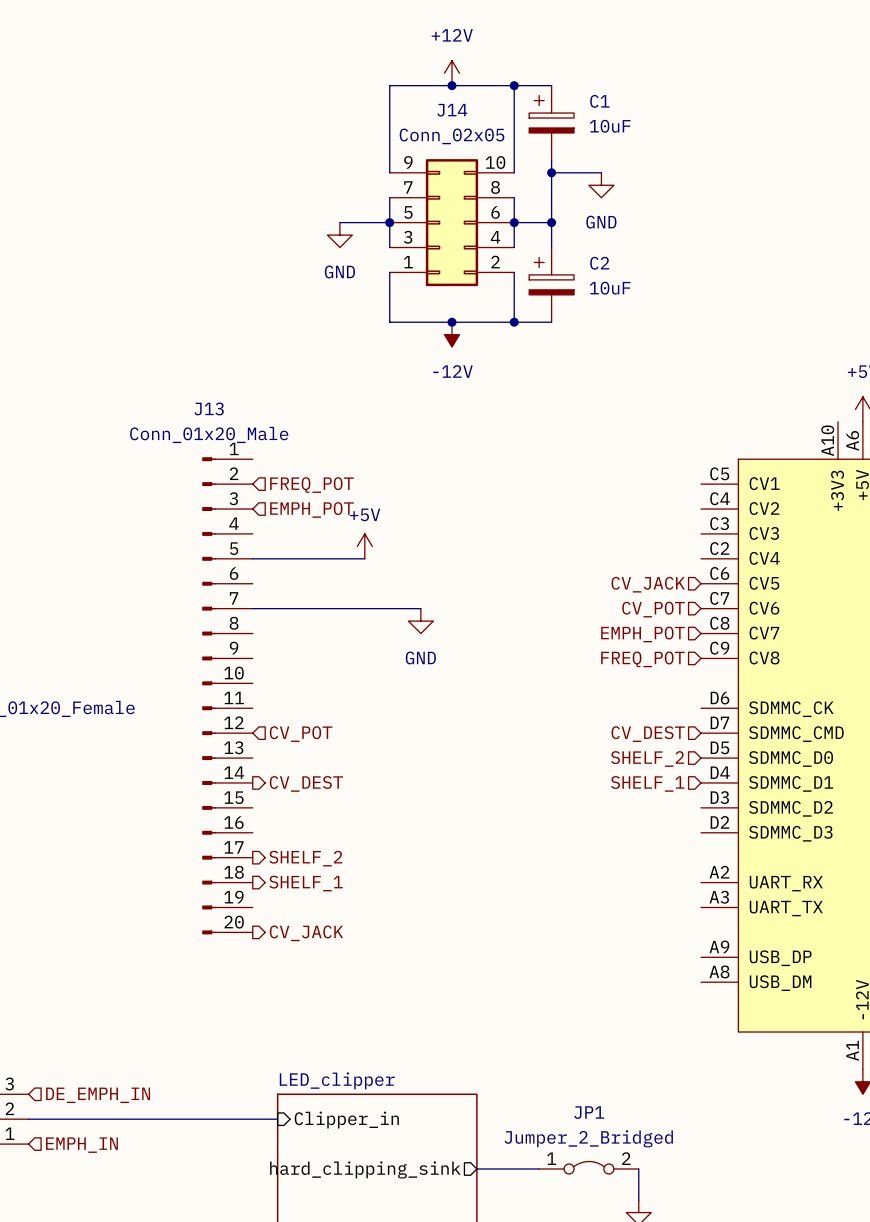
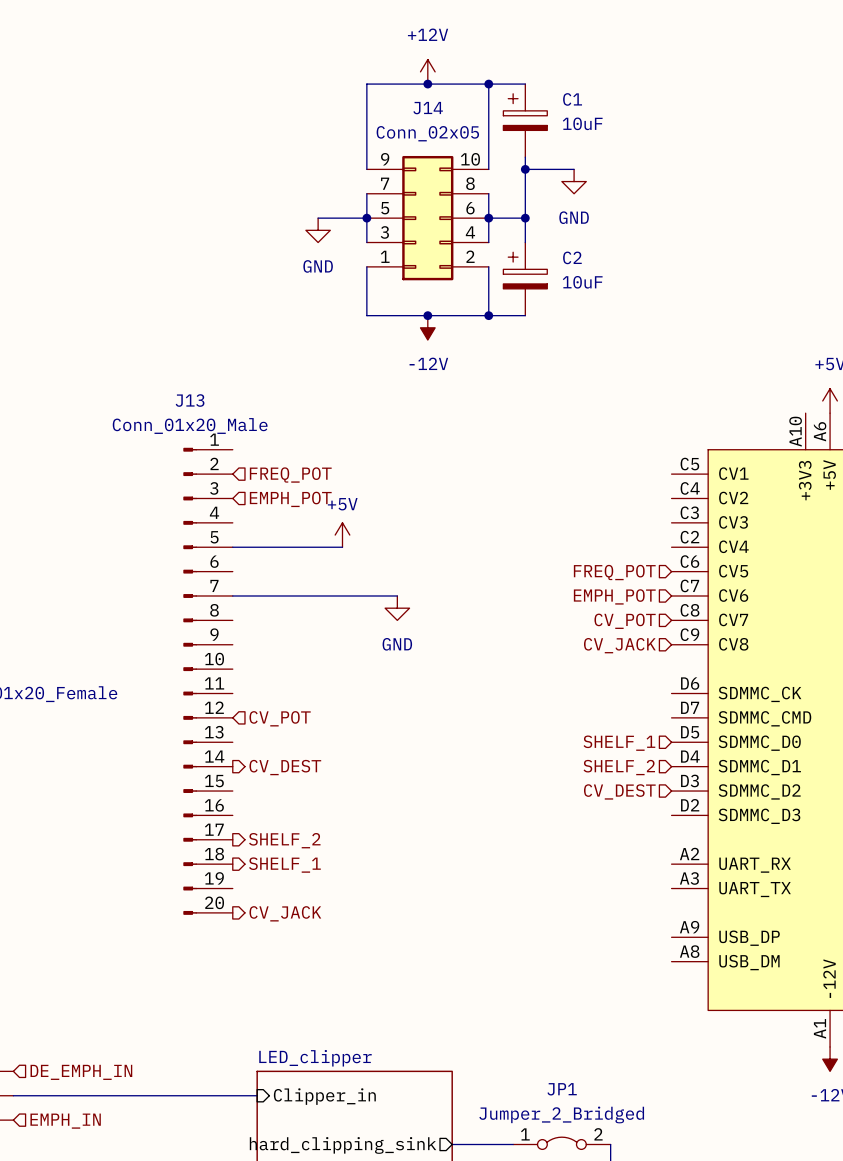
hierarchical label: CV_JACK (648, 584) -> FREQ_POT (614, 572)
hierarchical label: CV_POT (653, 609) -> EMPH_POT (614, 596)
hierarchical label: EMPH_POT (642, 634) -> CV_POT (625, 621)
hierarchical label: FREQ_POT (642, 659) -> CV_JACK (619, 645)
hierarchical label position: CV_DEST (648, 734) -> CV_DEST (619, 791)
hierarchical label: SHELF_2 (647, 759) -> SHELF_1 (619, 743)
hierarchical label: SHELF_1 (647, 783) -> SHELF_2 (619, 767)

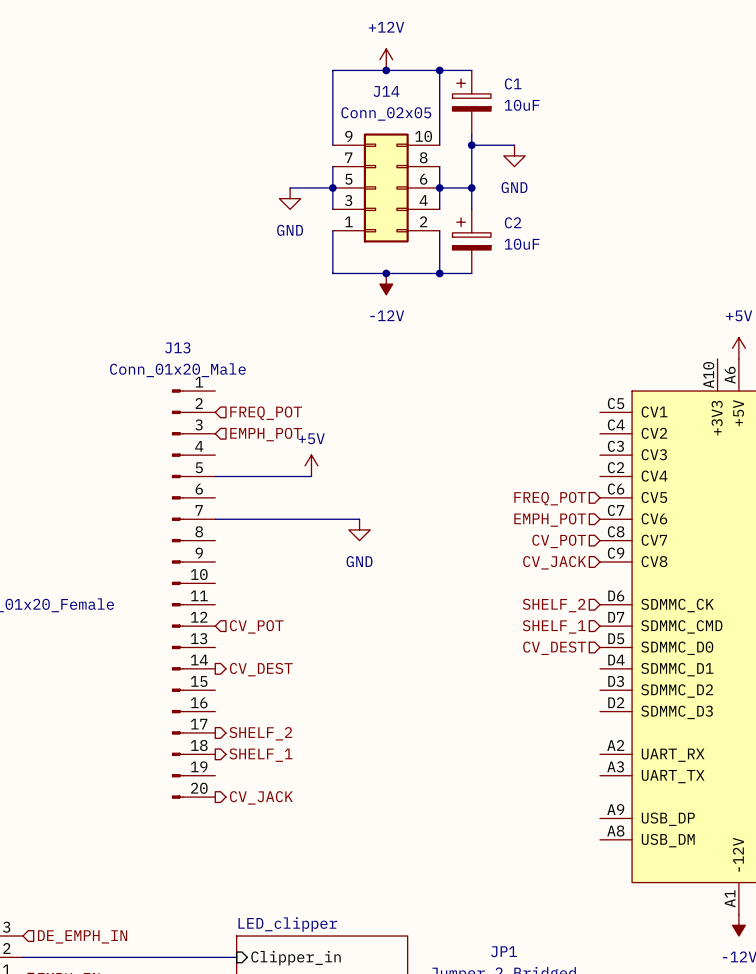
hierarchical label: none -> SHELF_1 (554, 626)
hierarchical label: SHELF_1 (619, 743) -> CV_DEST (554, 648)
hierarchical label position: SHELF_2 (619, 767) -> SHELF_2 (554, 605)
hierarchical label: CV_DEST (619, 791) -> none

